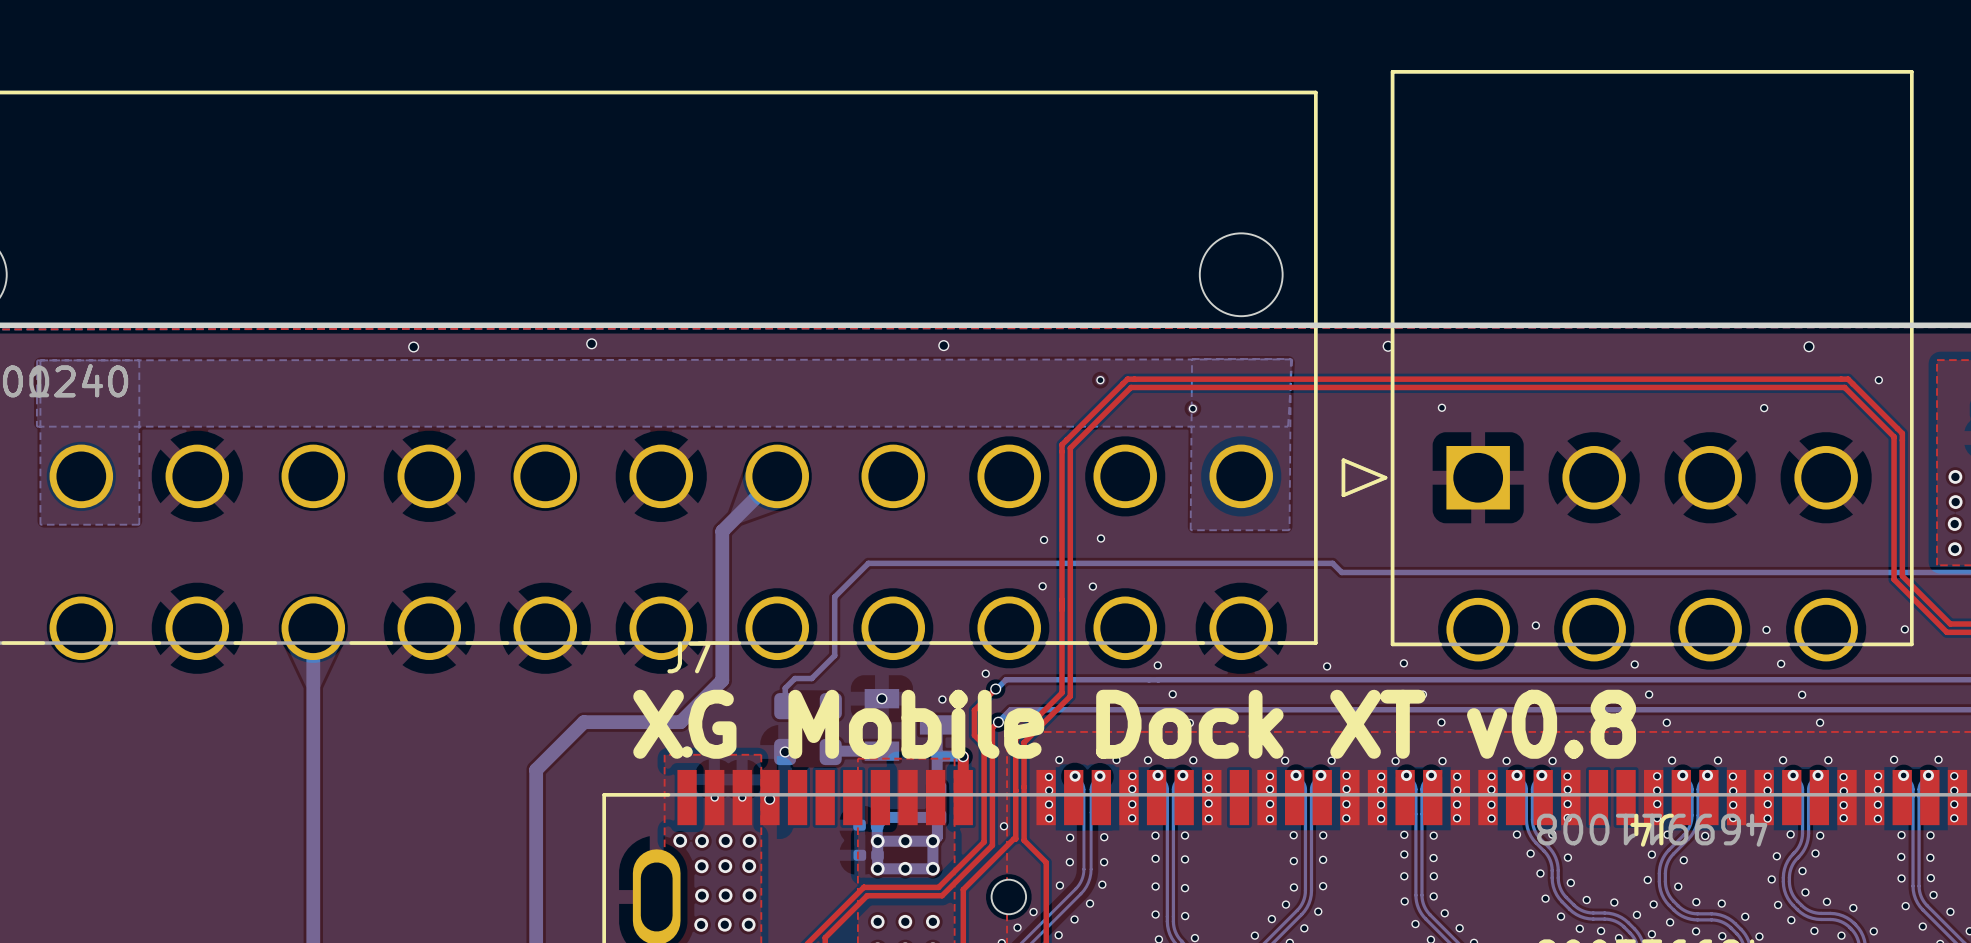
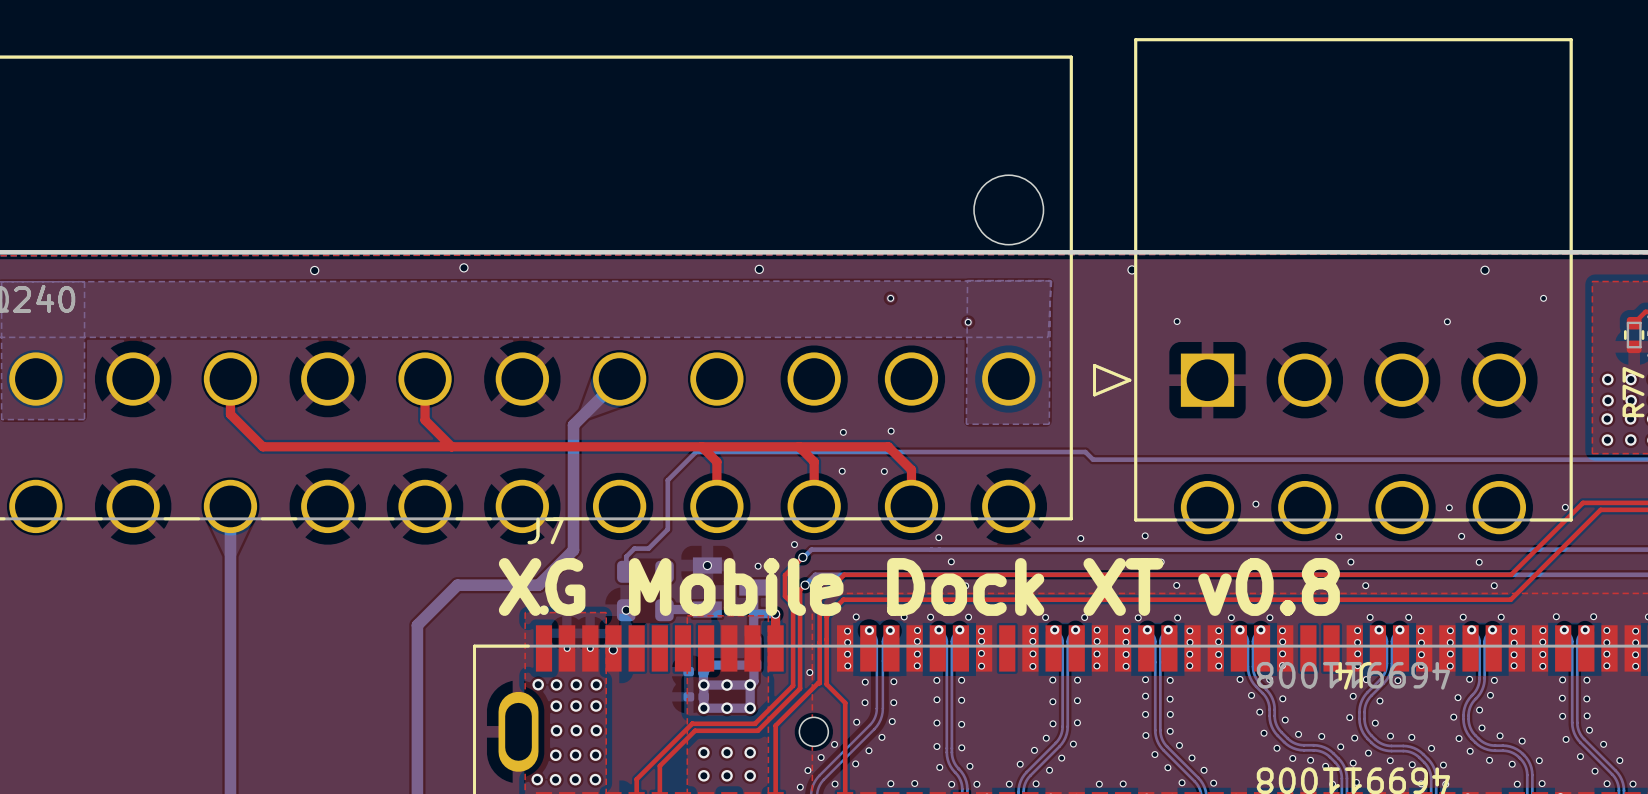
top track: none -> (230, 379) (230, 414) (262, 446) (888, 446) (911, 469) (911, 506)
top track: none -> (425, 379) (425, 420) (451, 446)
top track: none -> (701, 446) (716, 461) (716, 506)
top track: none -> (799, 446) (814, 461) (814, 506)
top track: (1950, 624) (1902, 576) (1902, 433) (1848, 379) (1127, 379) (1061, 444) (1061, 692) (1045, 709) -> (1603, 502) (1583, 502) (1511, 574) (844, 574)
top track: (1946, 632) (1894, 579) (1894, 436) (1844, 387) (1131, 387) (1070, 448) (1070, 696) (1024, 742) (1024, 759) -> (1600, 509) (1510, 599) (843, 599) (826, 616)

